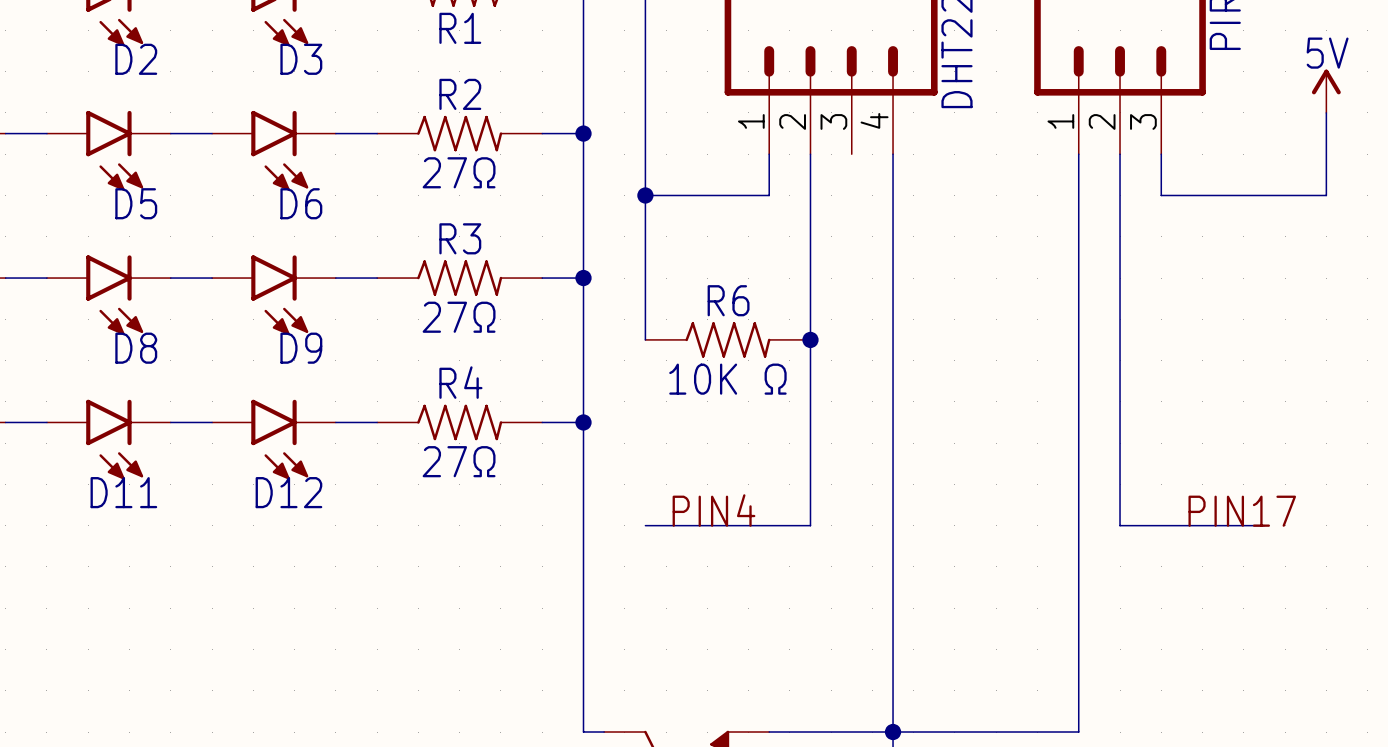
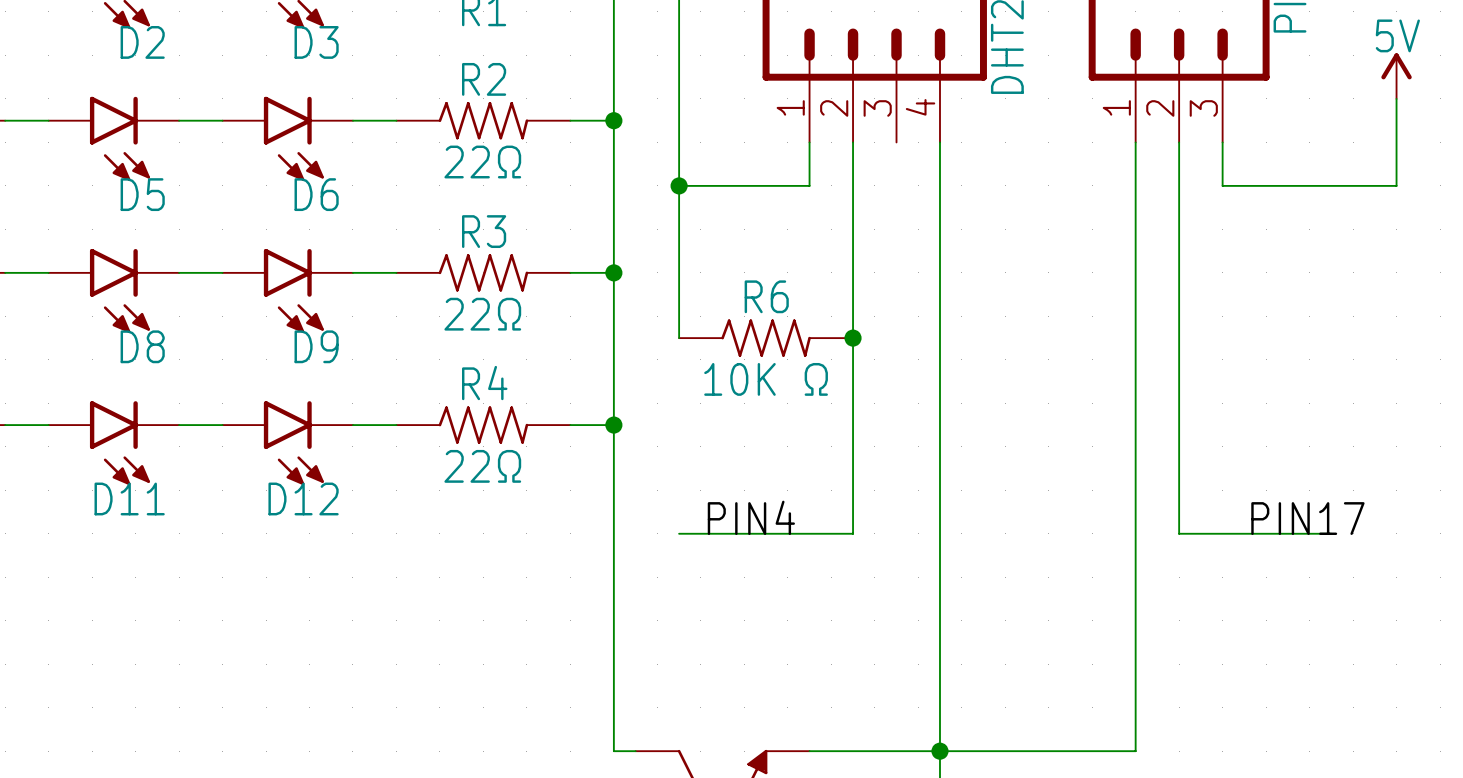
R2 value: 27Ω (459, 172) -> 22Ω (482, 162)
R3 value: 27Ω (459, 317) -> 22Ω (482, 314)
R4 value: 27Ω (459, 461) -> 22Ω (482, 466)

